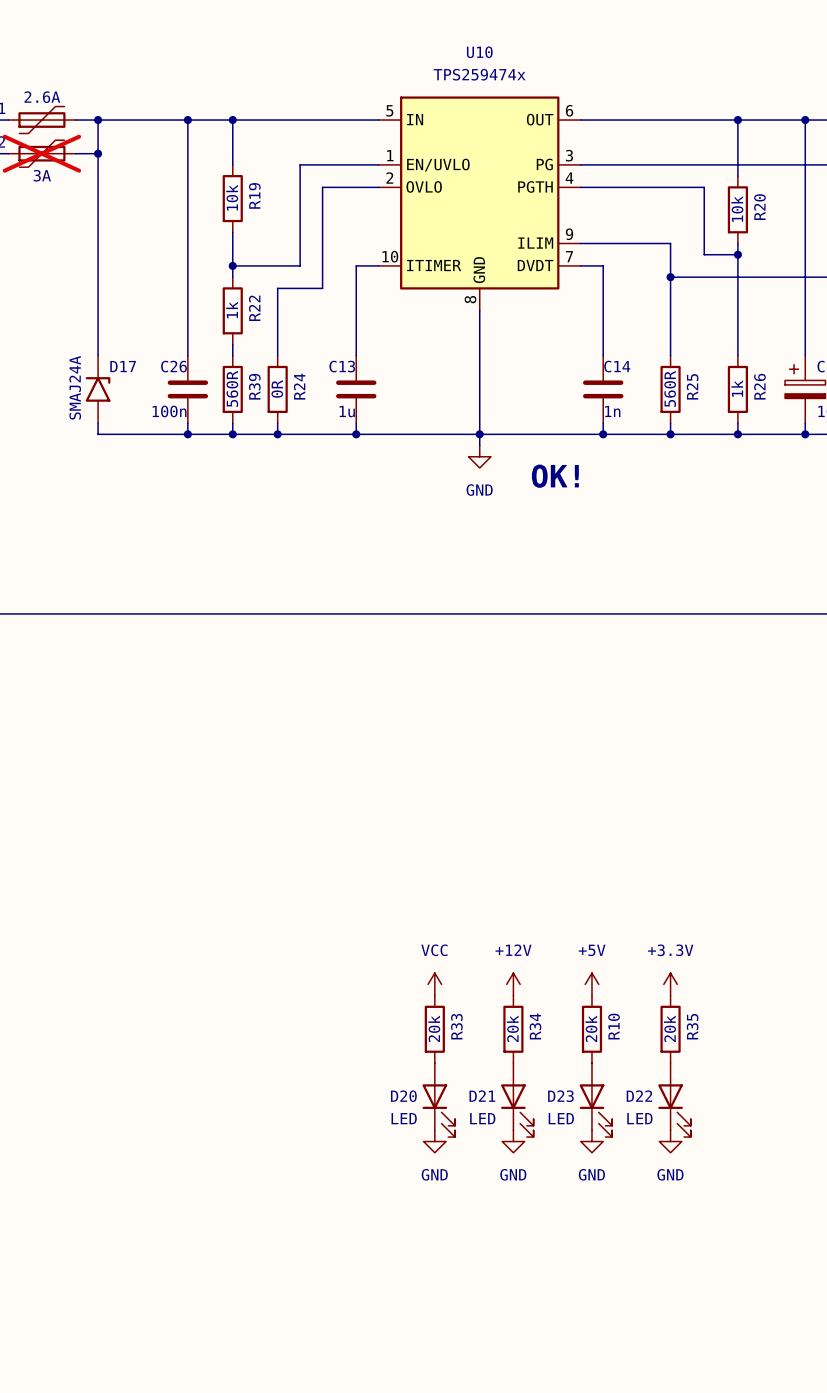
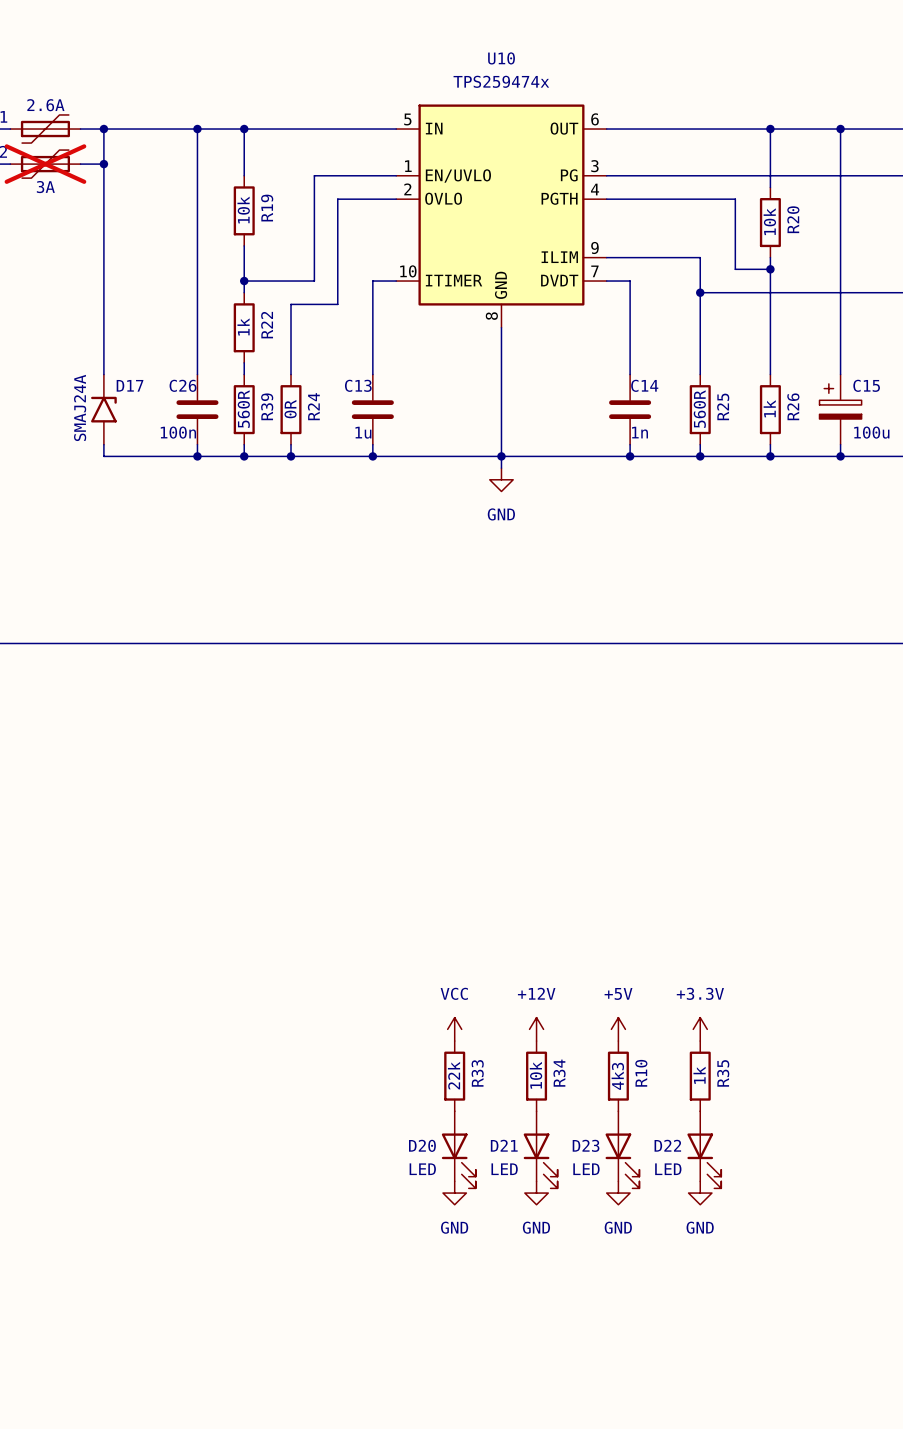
text: OK! (555, 476) -> none
R33 value: 20k (434, 1028) -> 22k (454, 1075)
R34 value: 20k (512, 1028) -> 10k (535, 1075)
R10 value: 20k (591, 1028) -> 4k3 (617, 1076)
R35 value: 20k (670, 1028) -> 1k (699, 1075)

